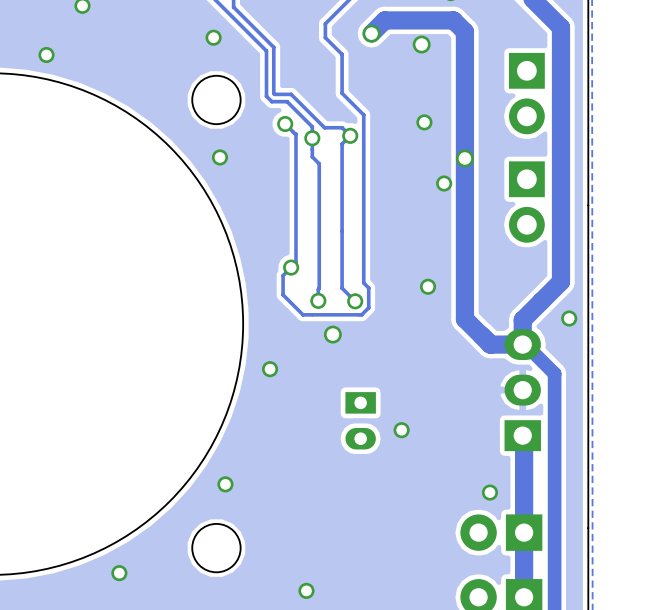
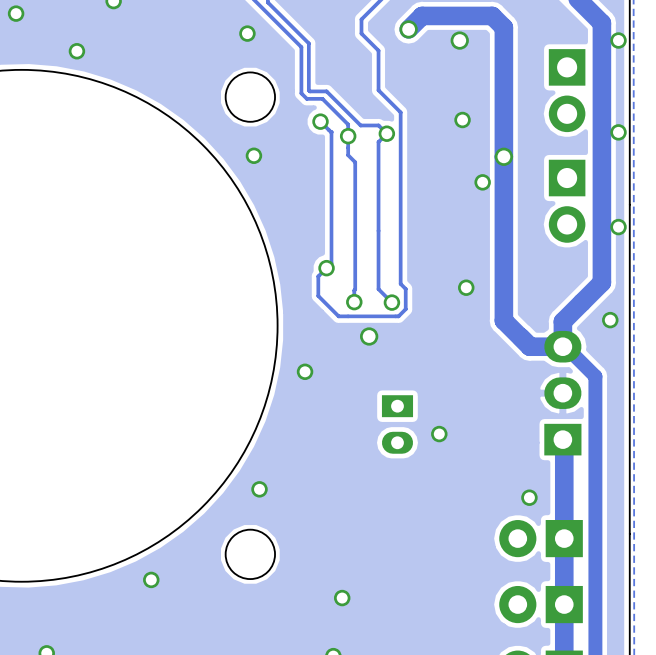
via: none -> (618, 40)
via: none -> (618, 132)
via: none -> (618, 227)

